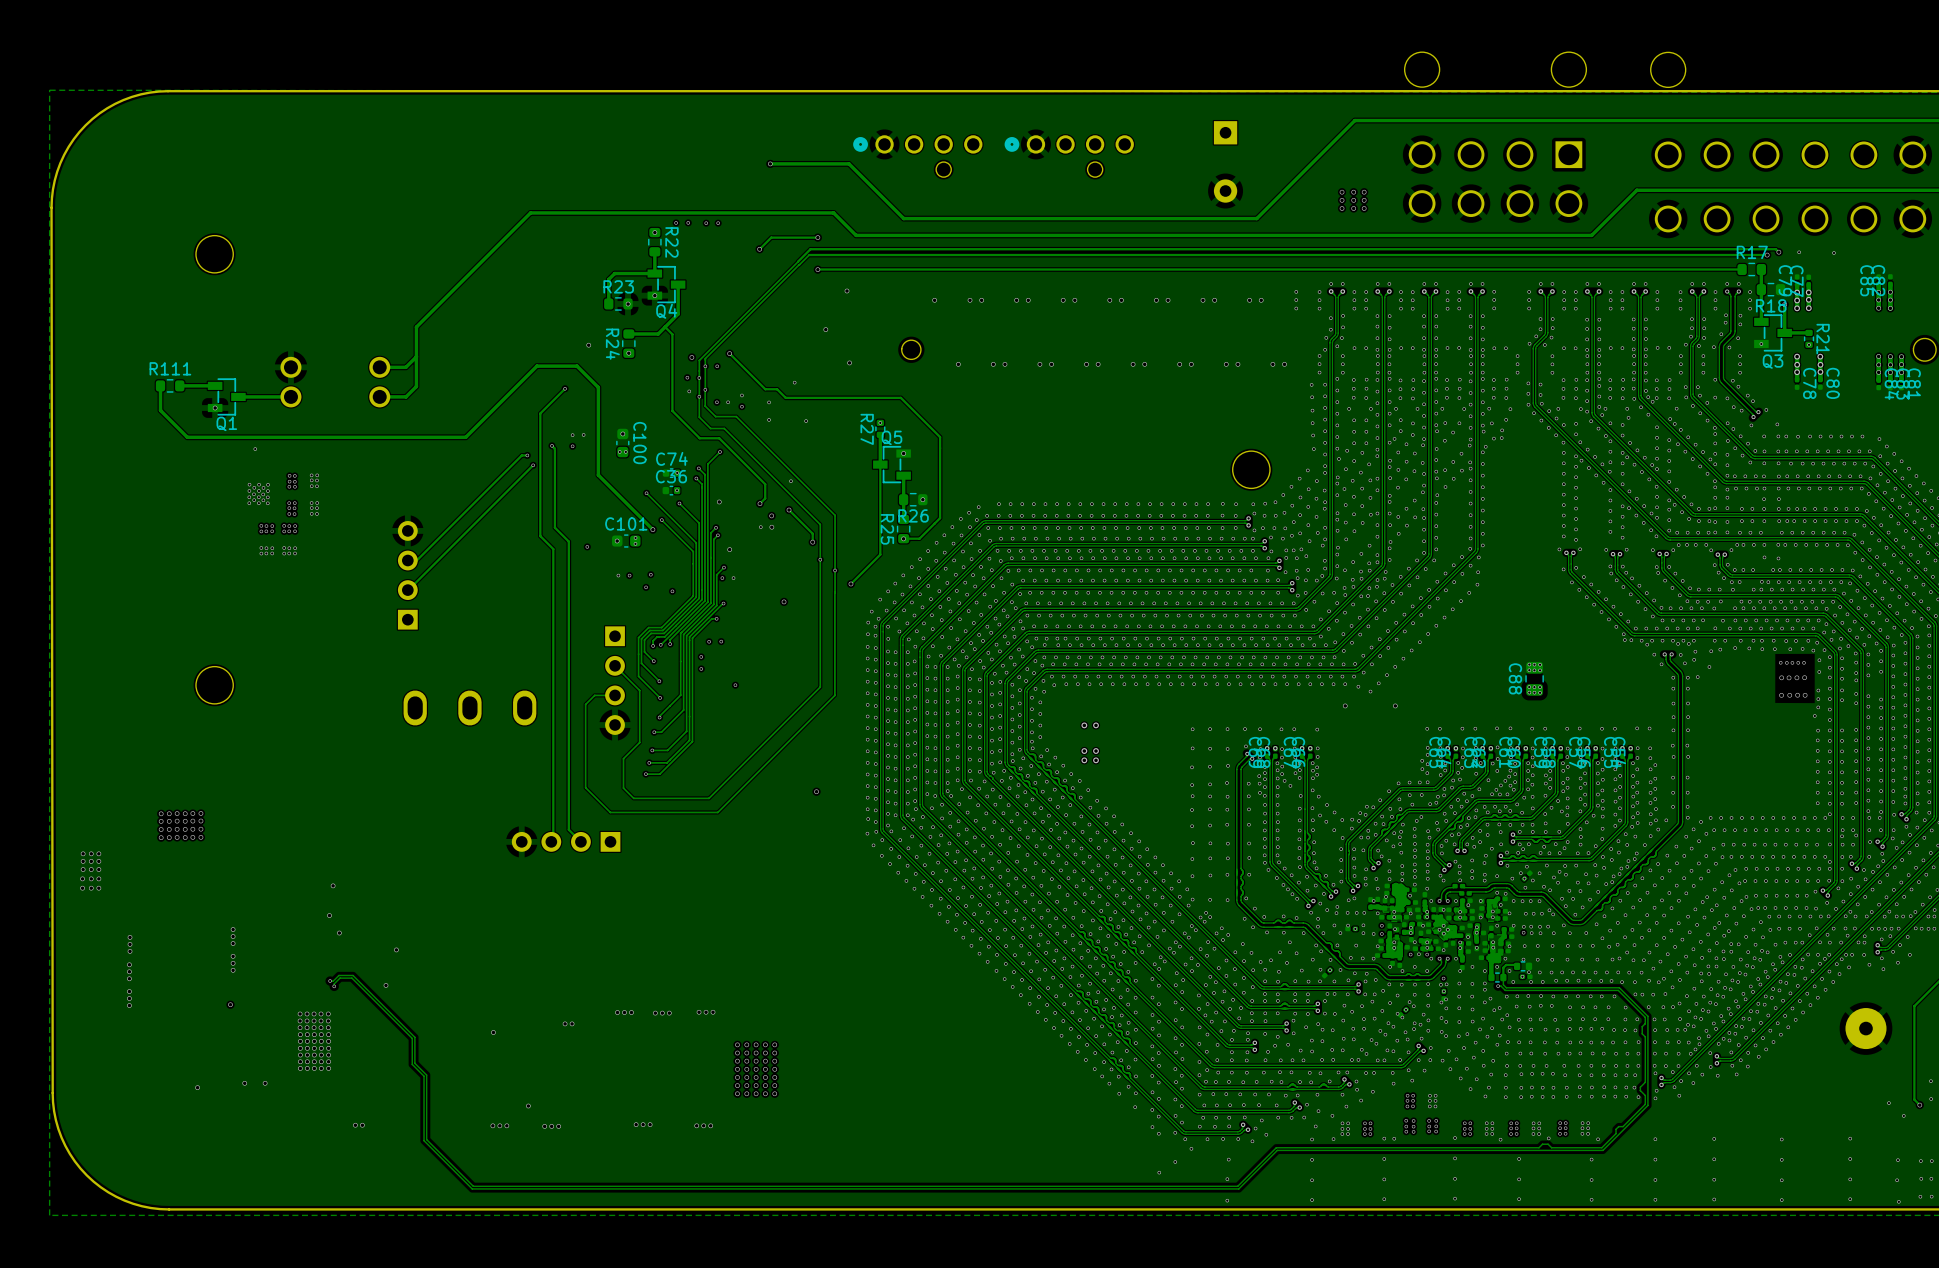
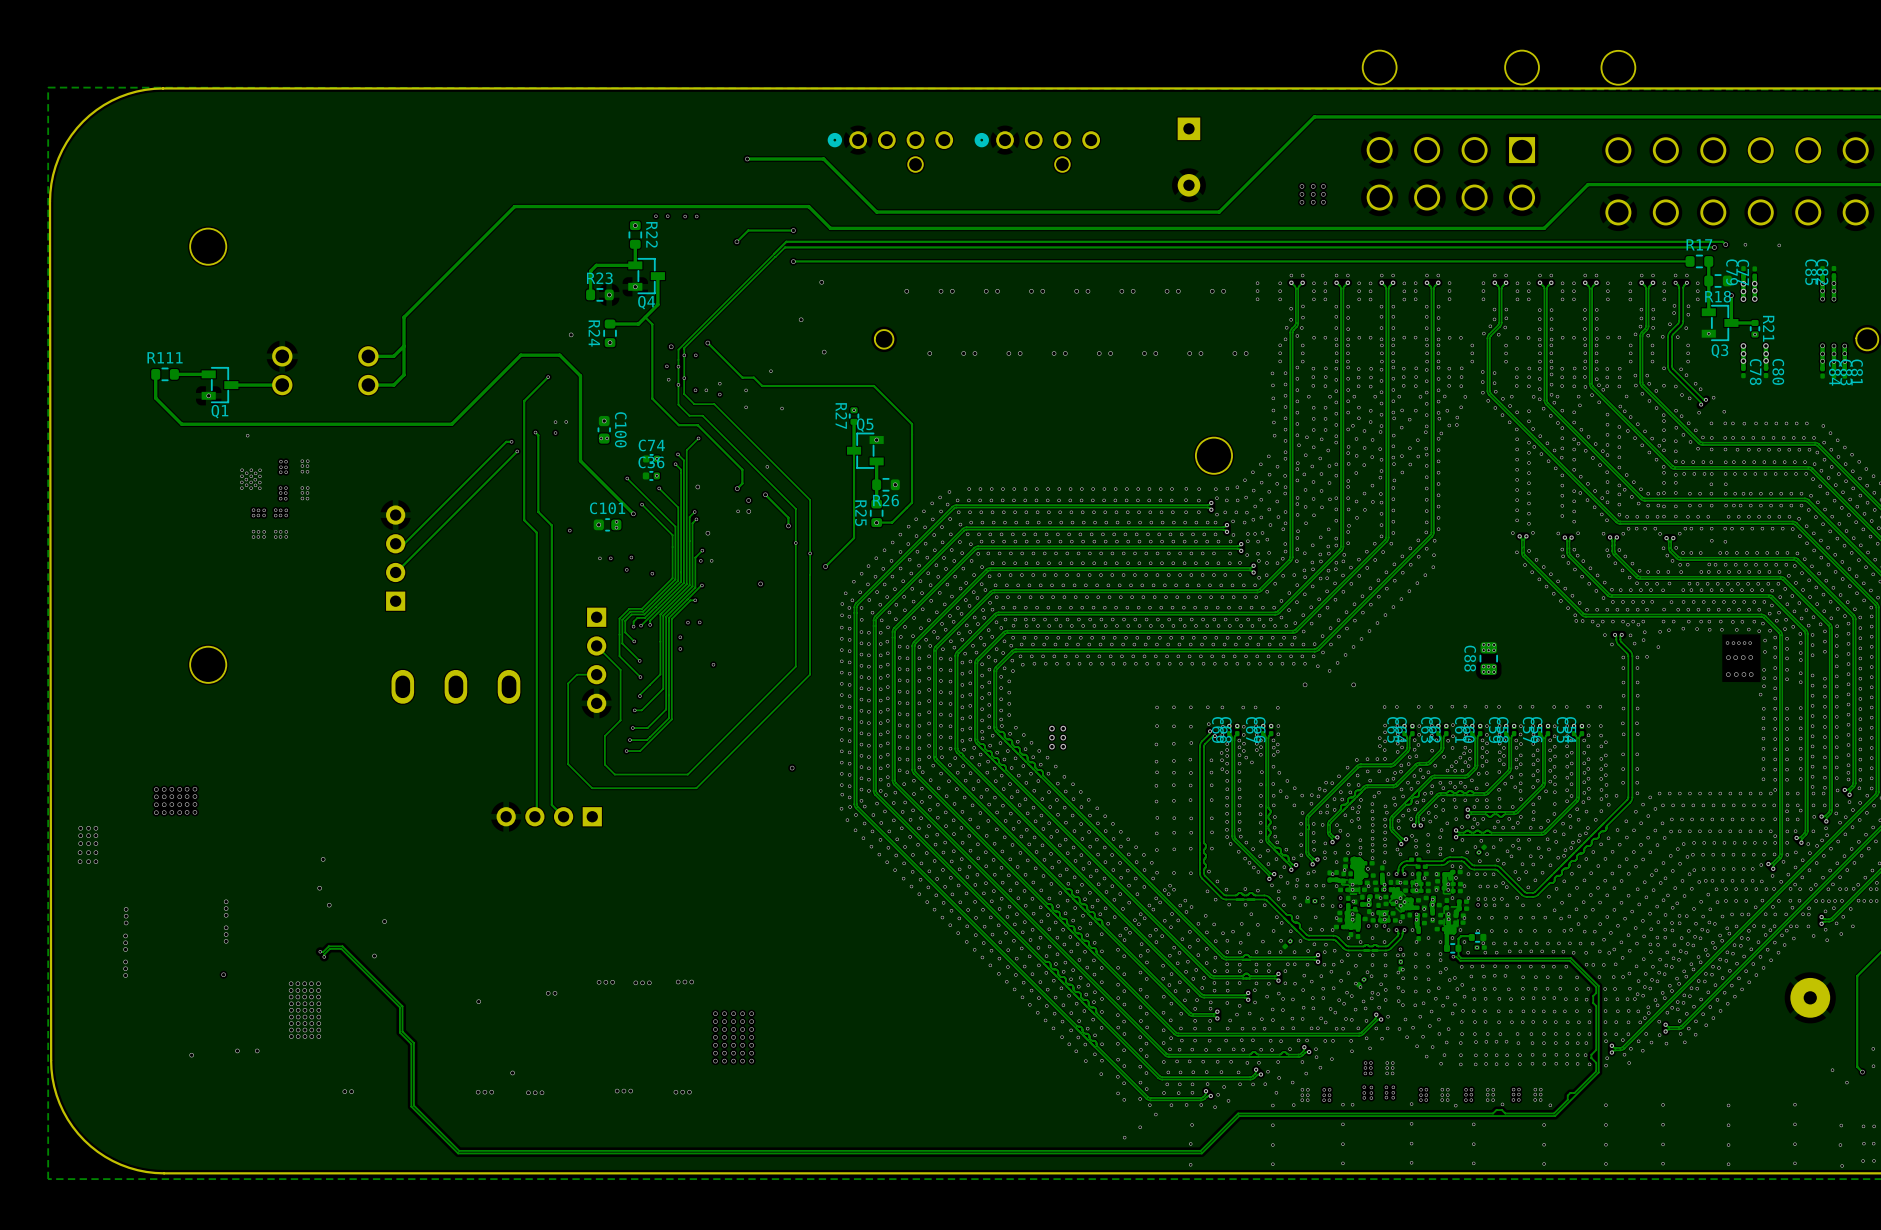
via: (1084, 725) -> none
via: (1096, 725) -> none
via: none -> (1051, 746)
via: none -> (1063, 746)

